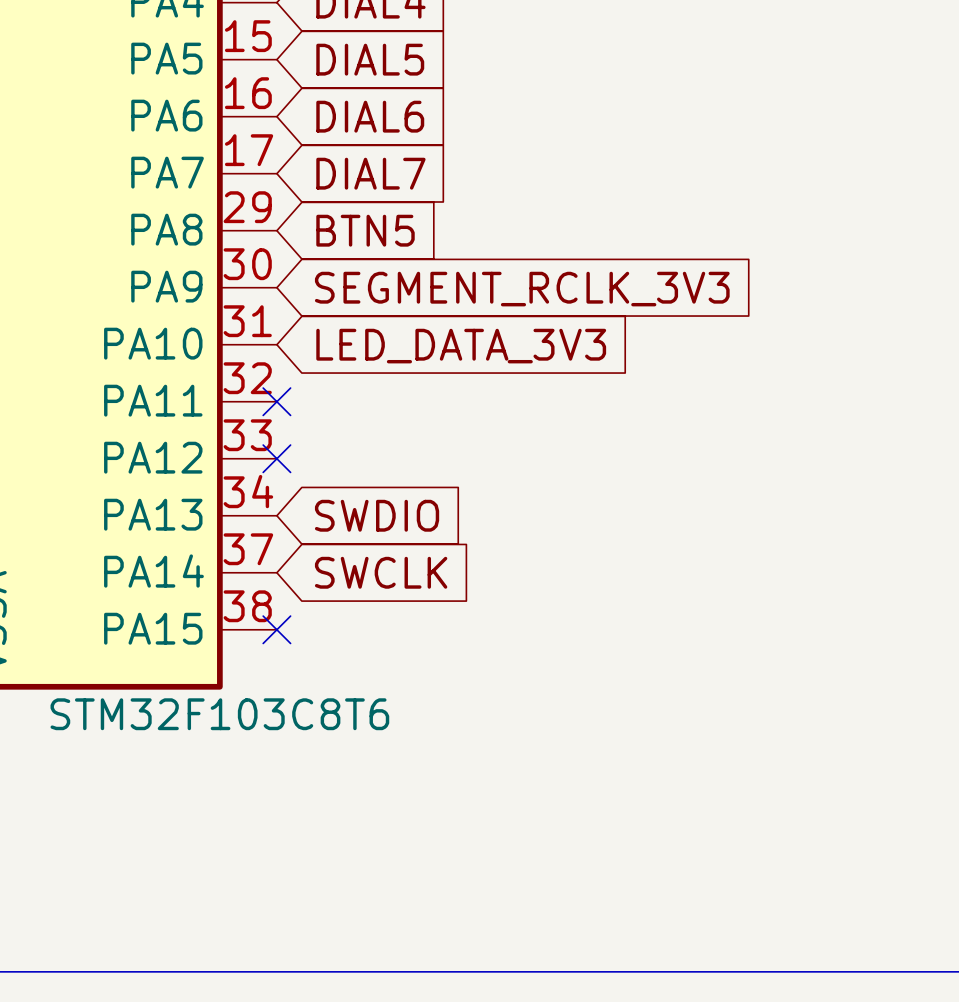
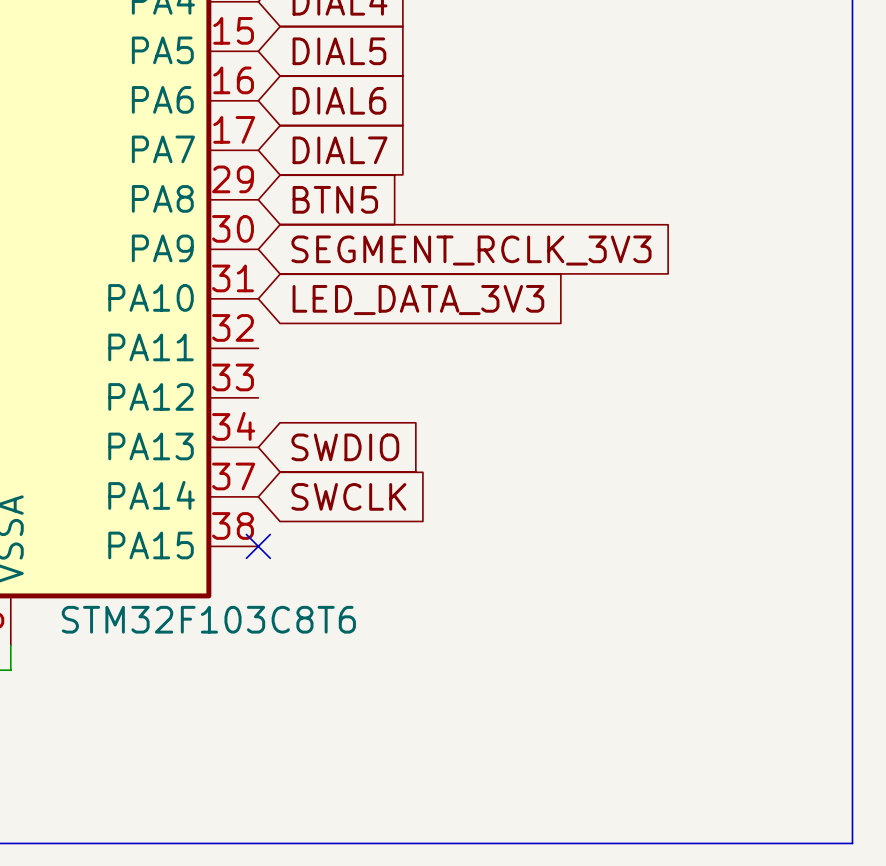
no-connect mark: (276, 401) -> none
no-connect mark: (276, 458) -> none

